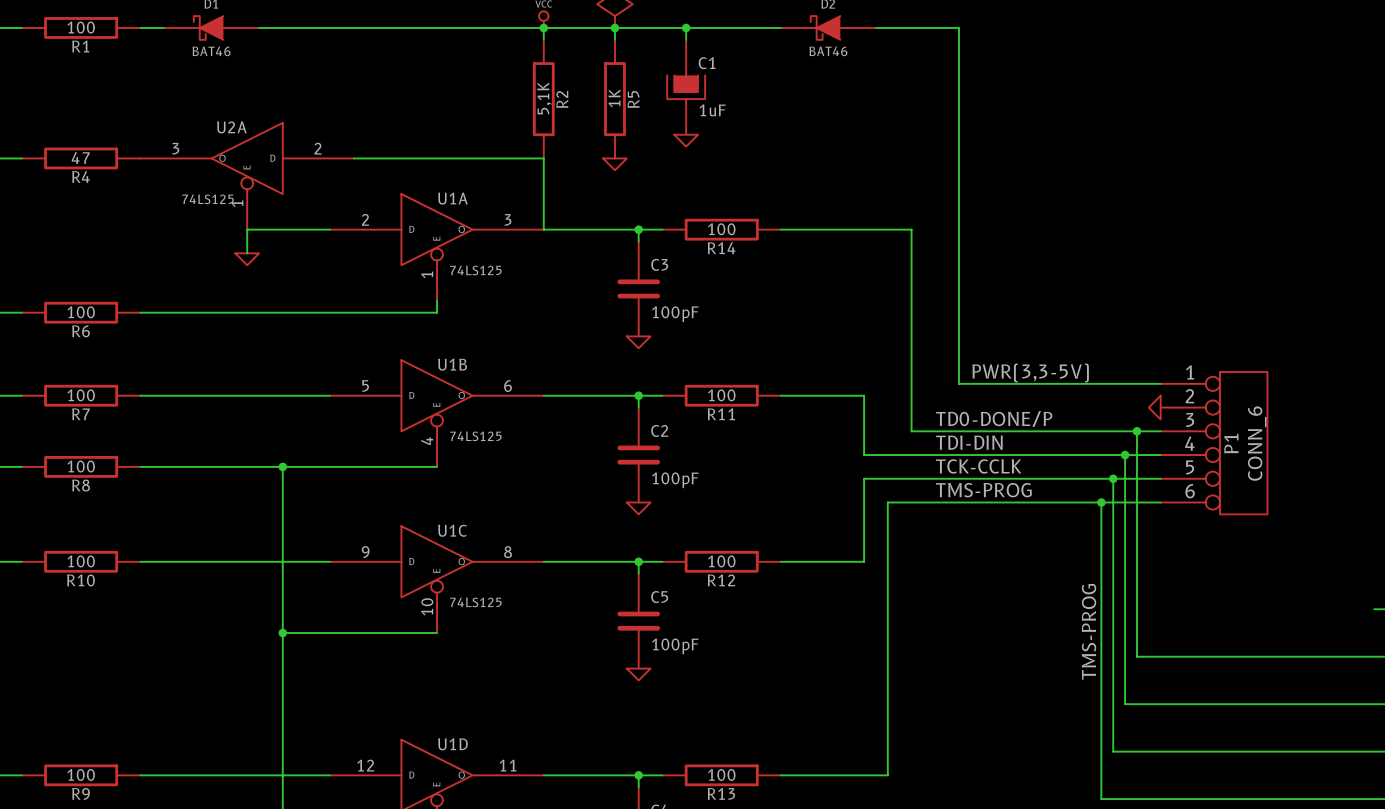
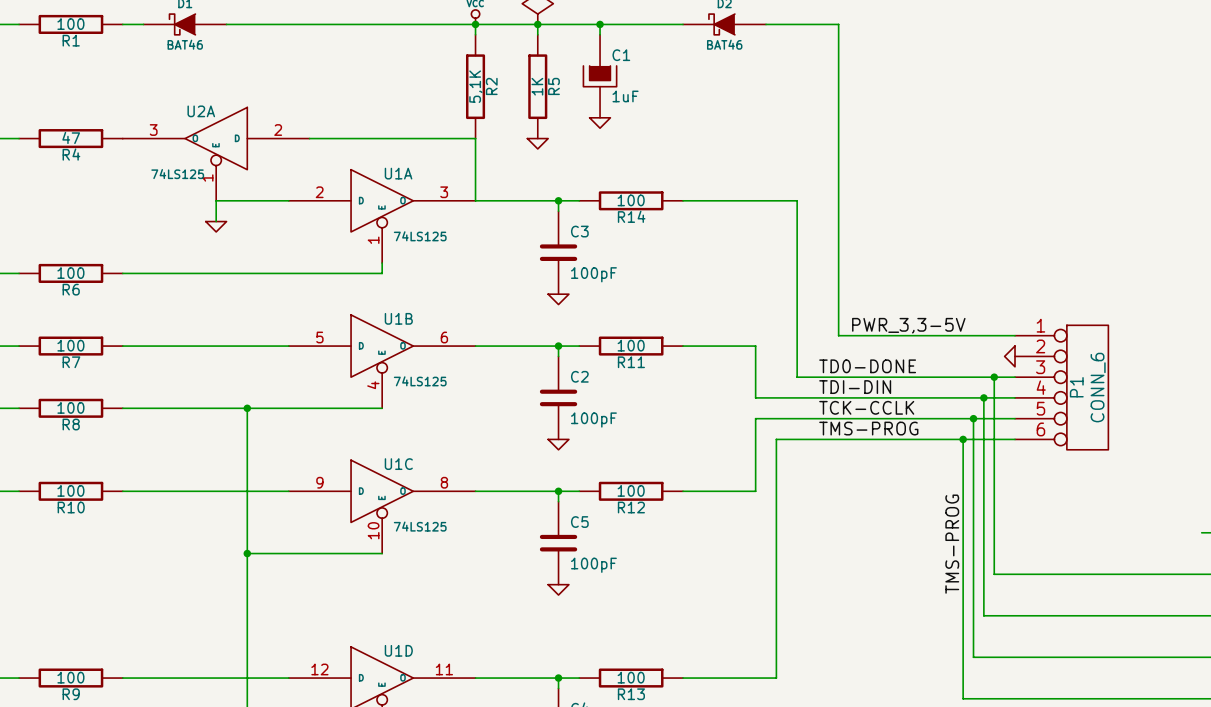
label: PWR(3,3-5V) (1030, 373) -> PWR_3,3-5V (908, 325)
label: TD0-DONE/P (994, 418) -> TD0-DONE (867, 366)

